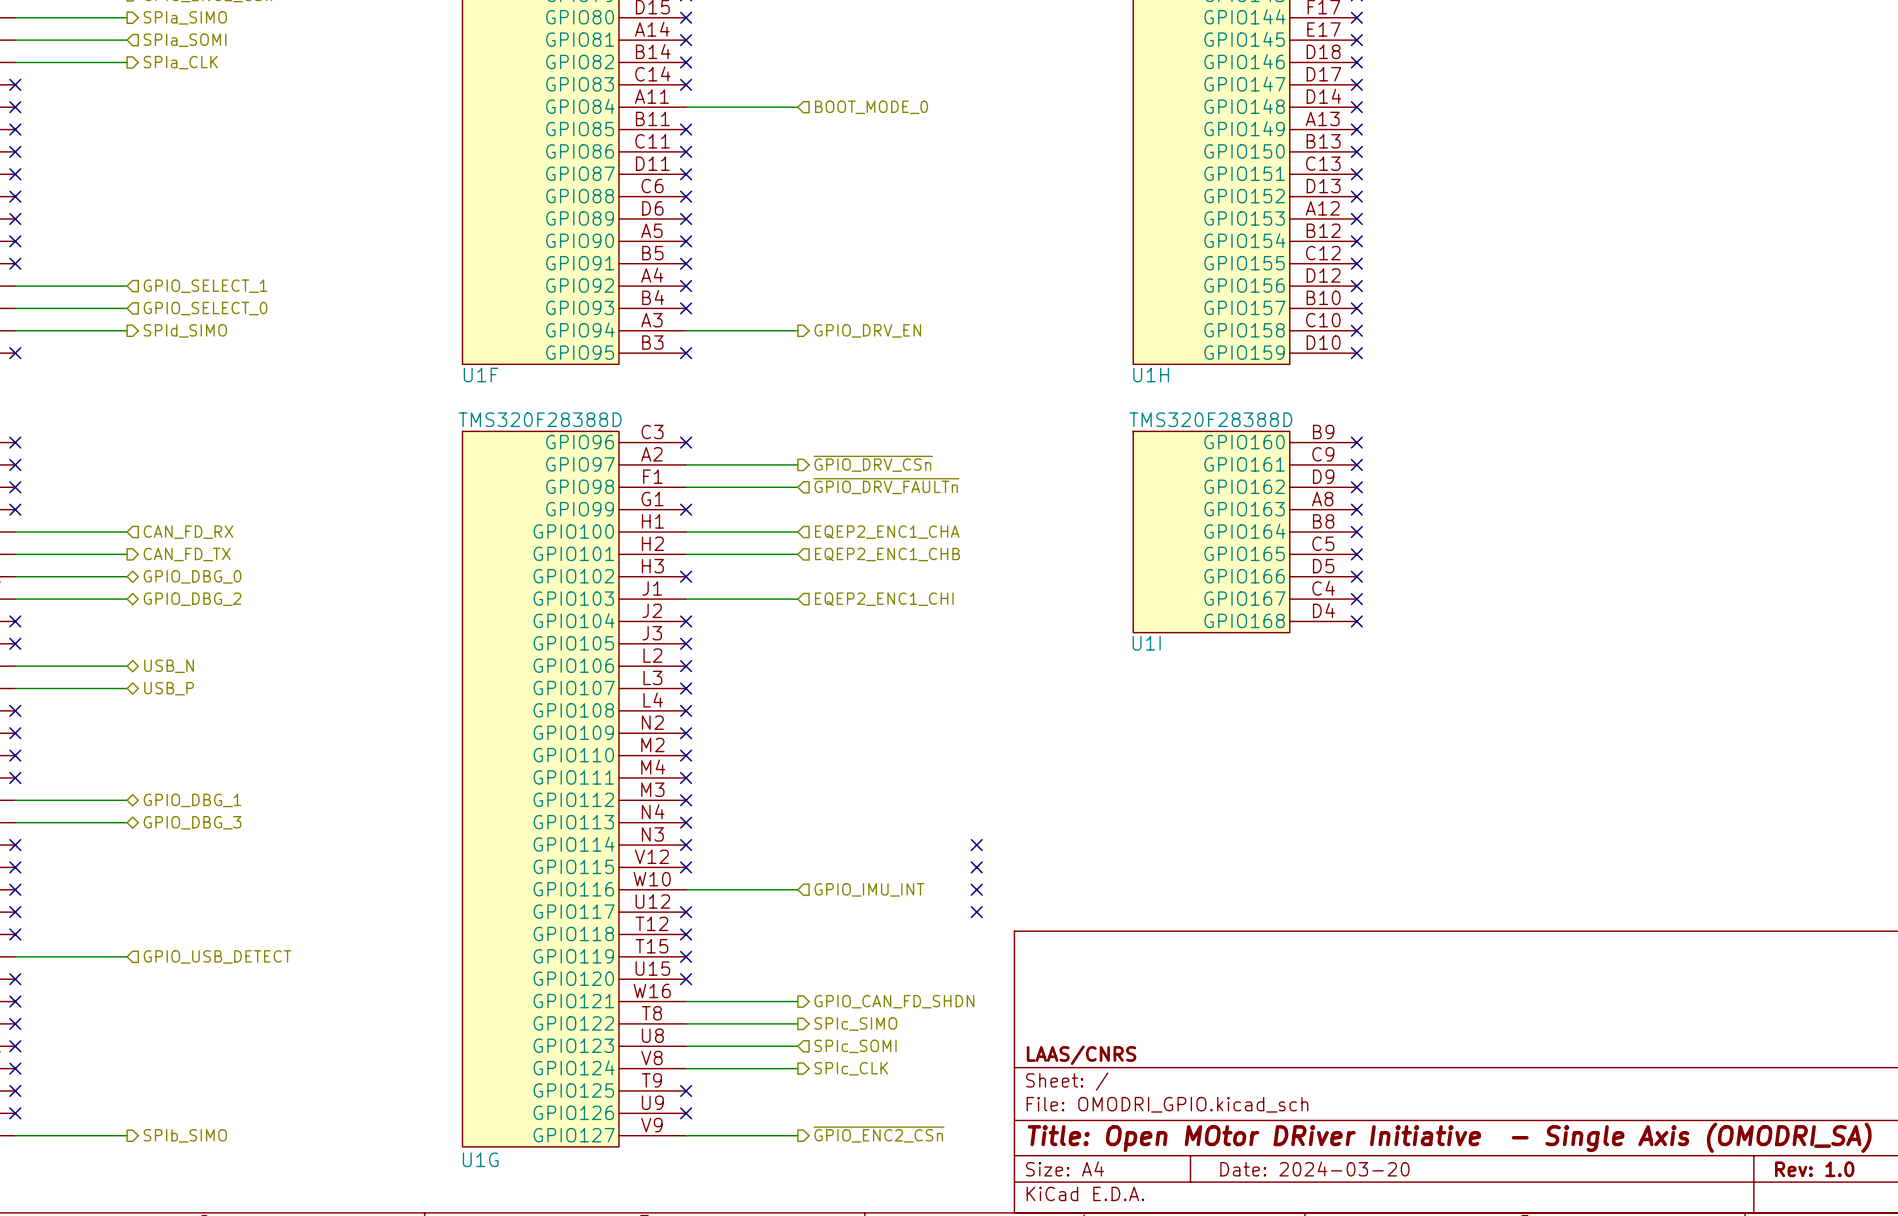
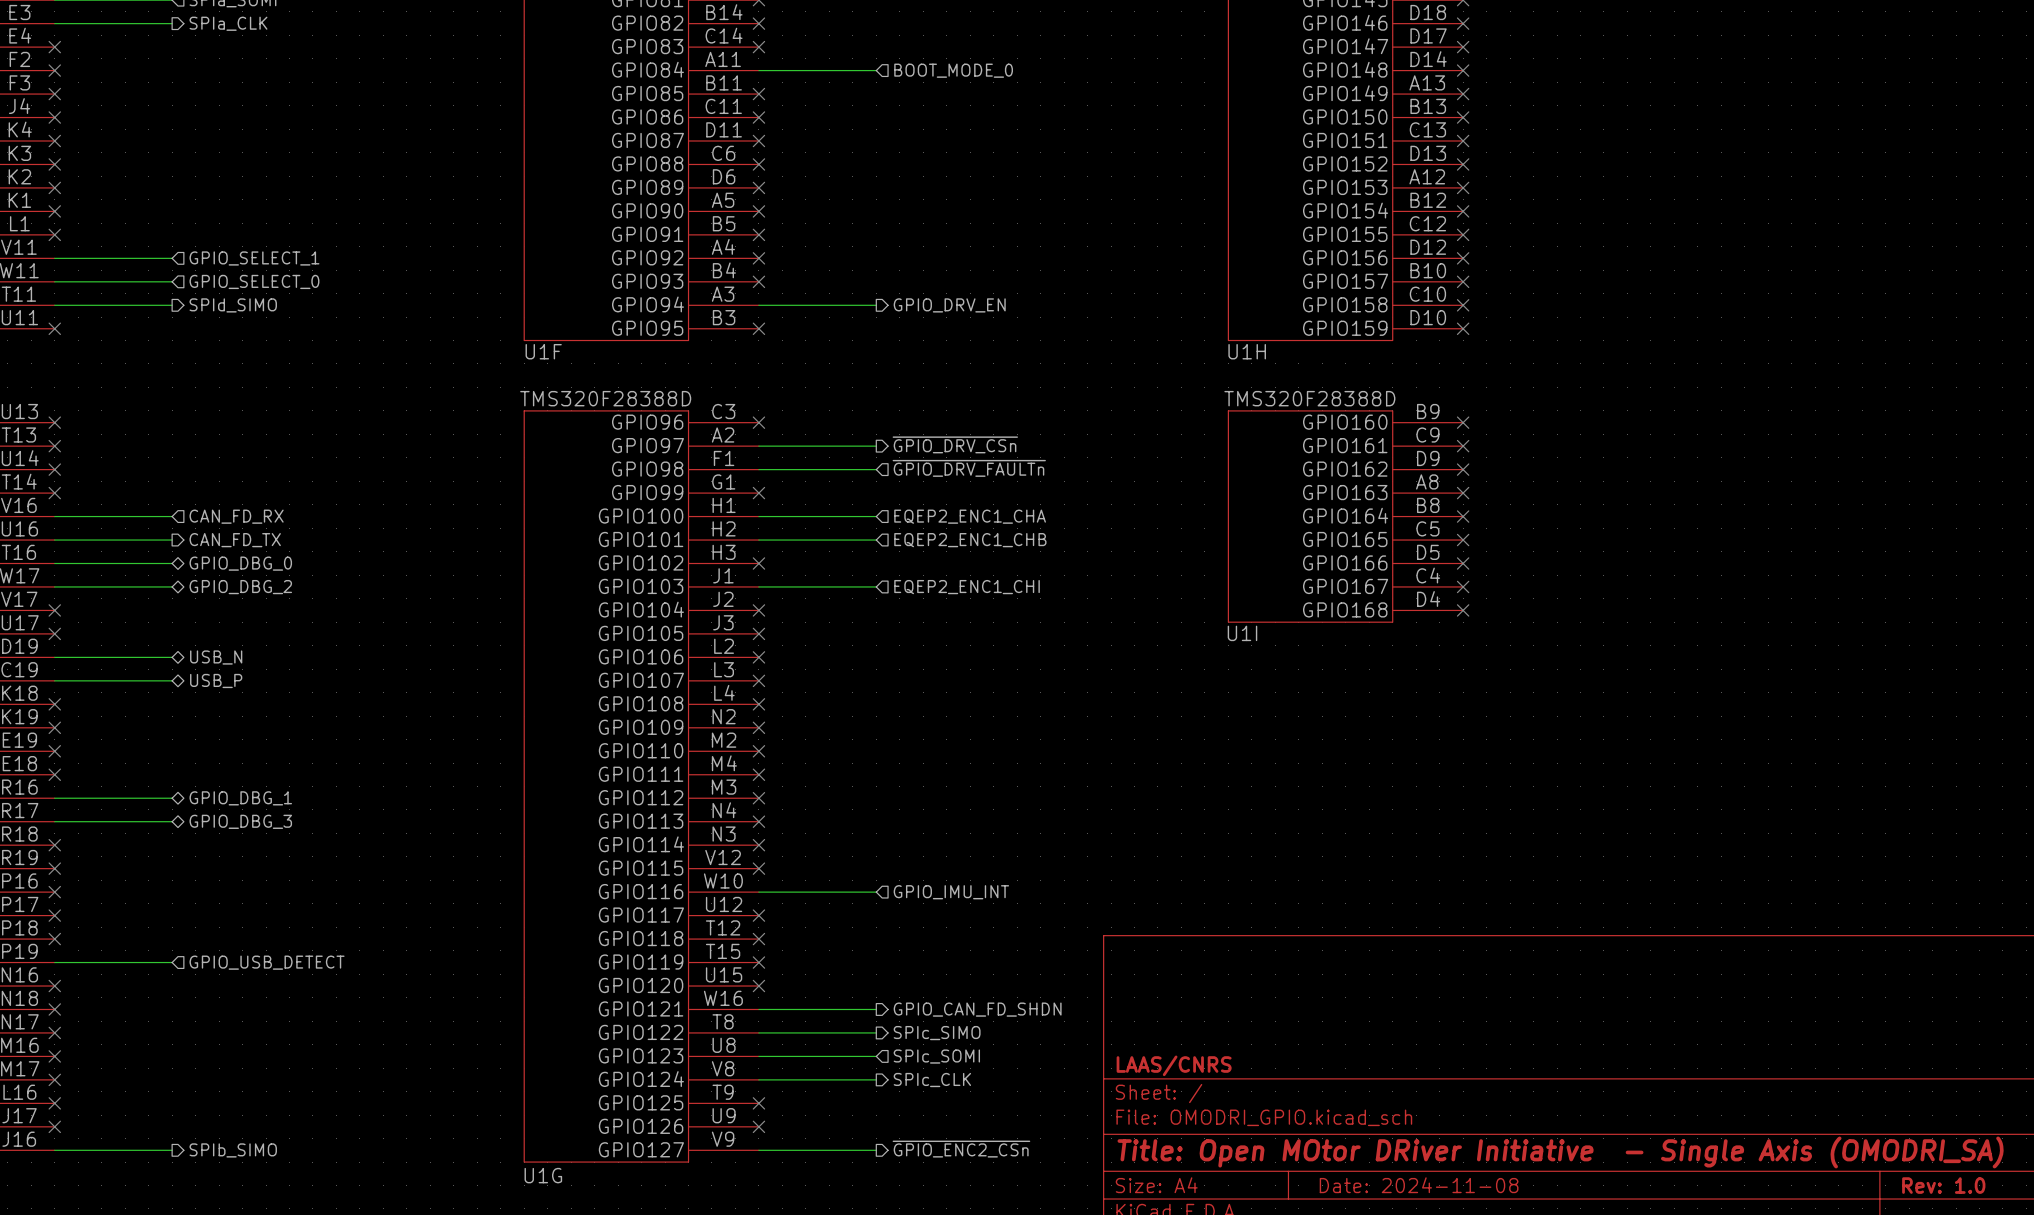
no-connect mark: (976, 845) -> none
no-connect mark: (976, 867) -> none
no-connect mark: (976, 889) -> none
no-connect mark: (976, 912) -> none
title block: Date: 2024-03-20 (1314, 1168) -> Date: 2024-11-08 (1419, 1185)

